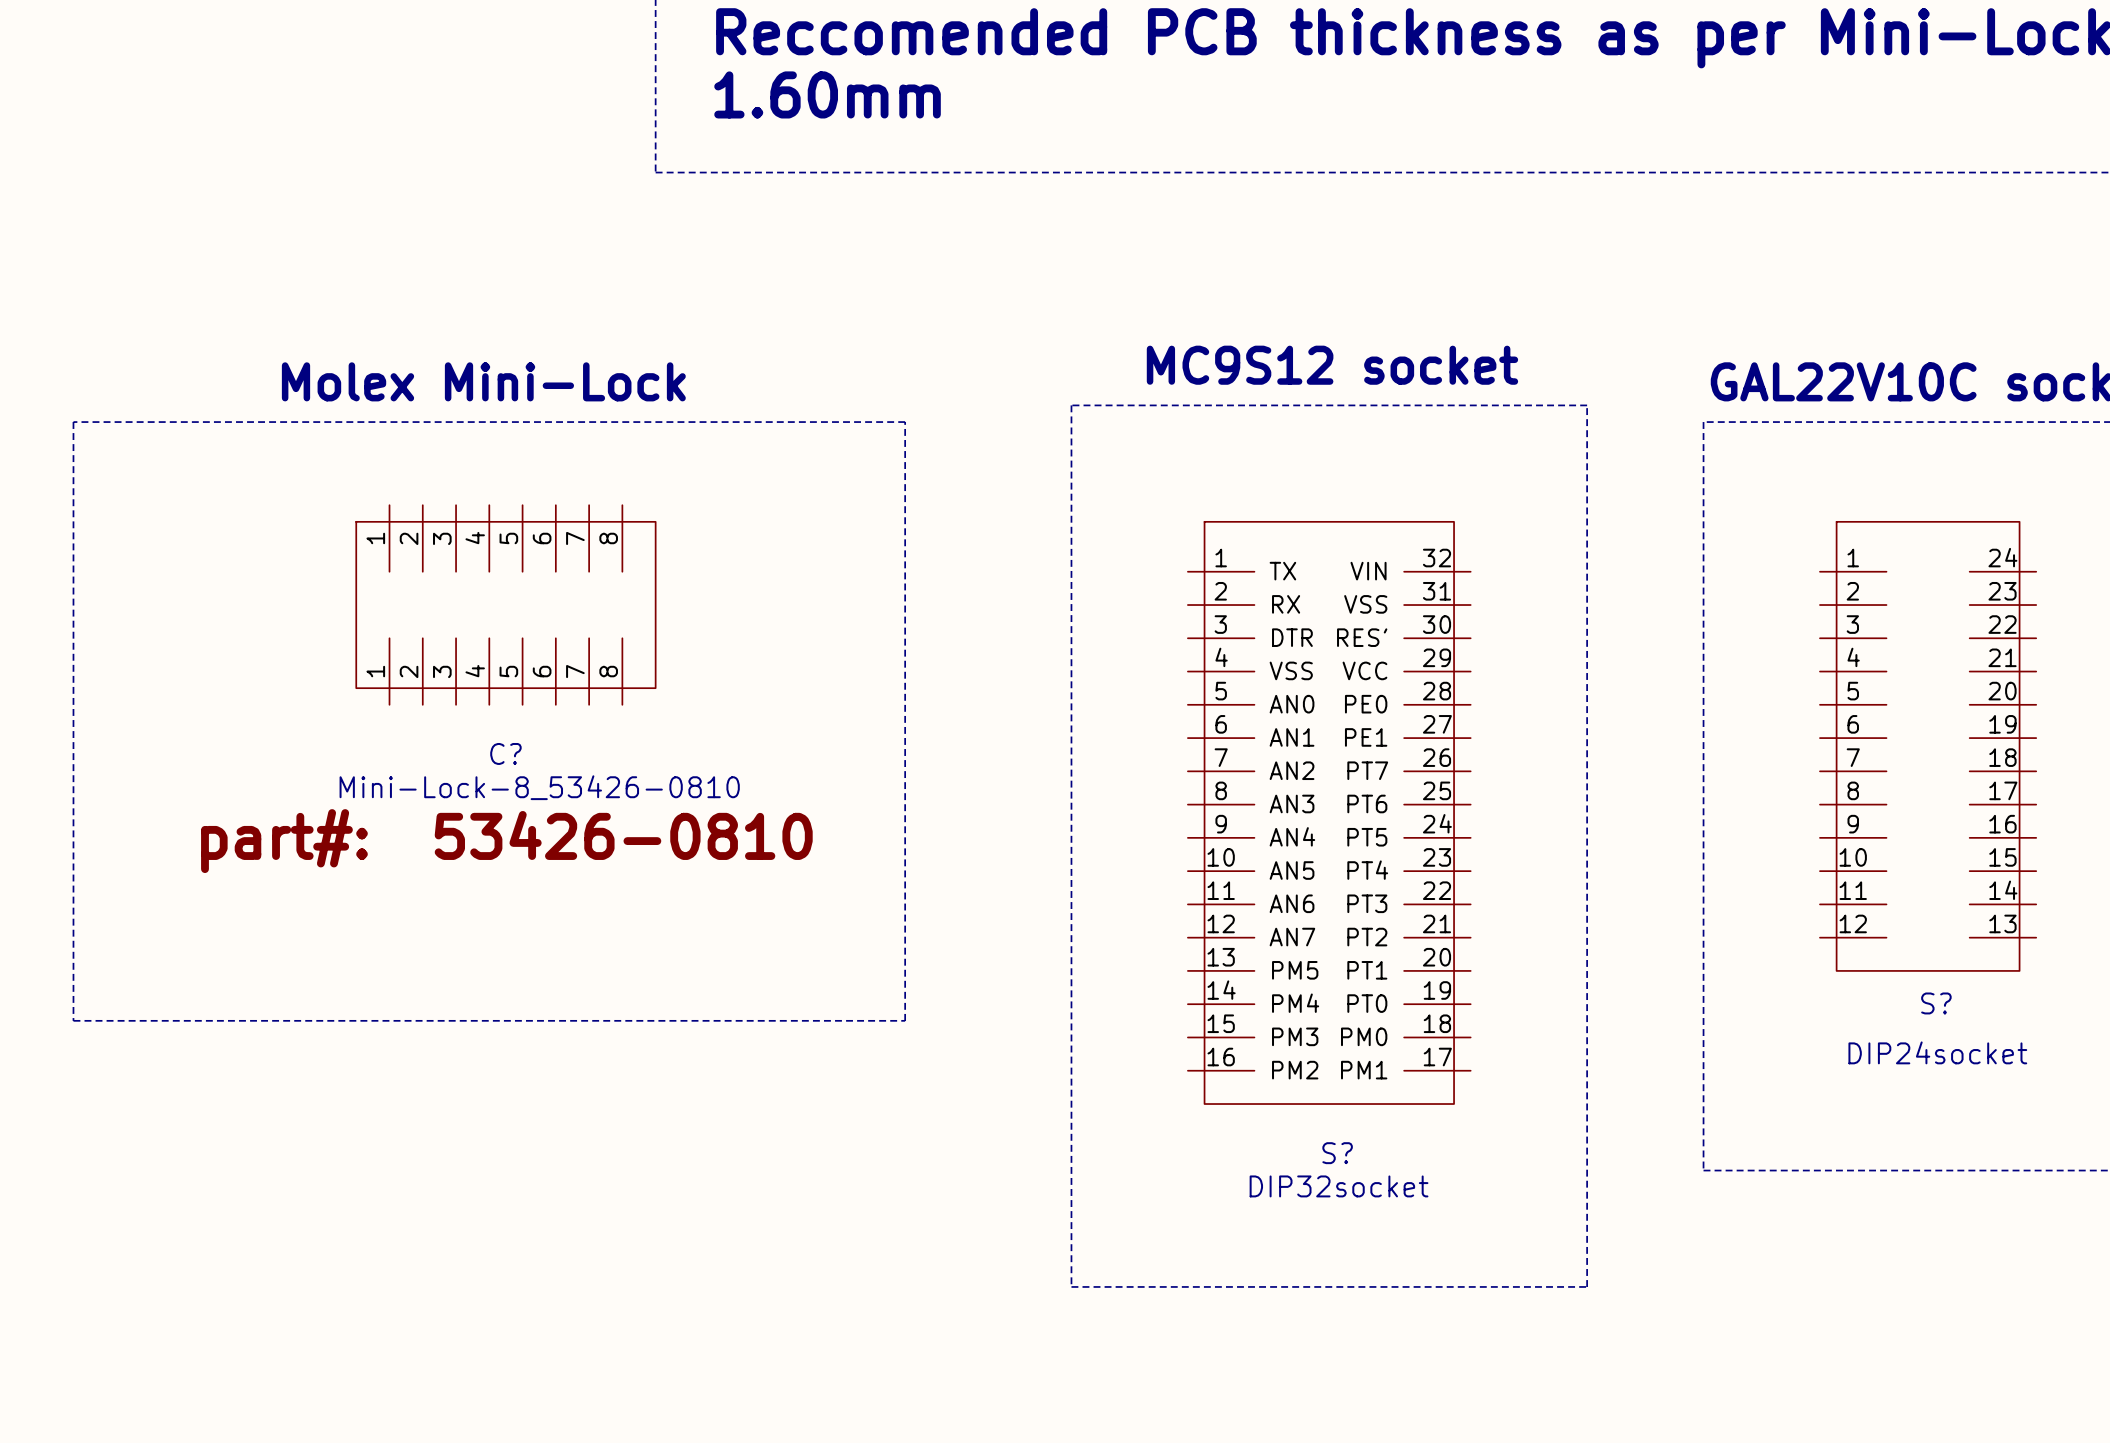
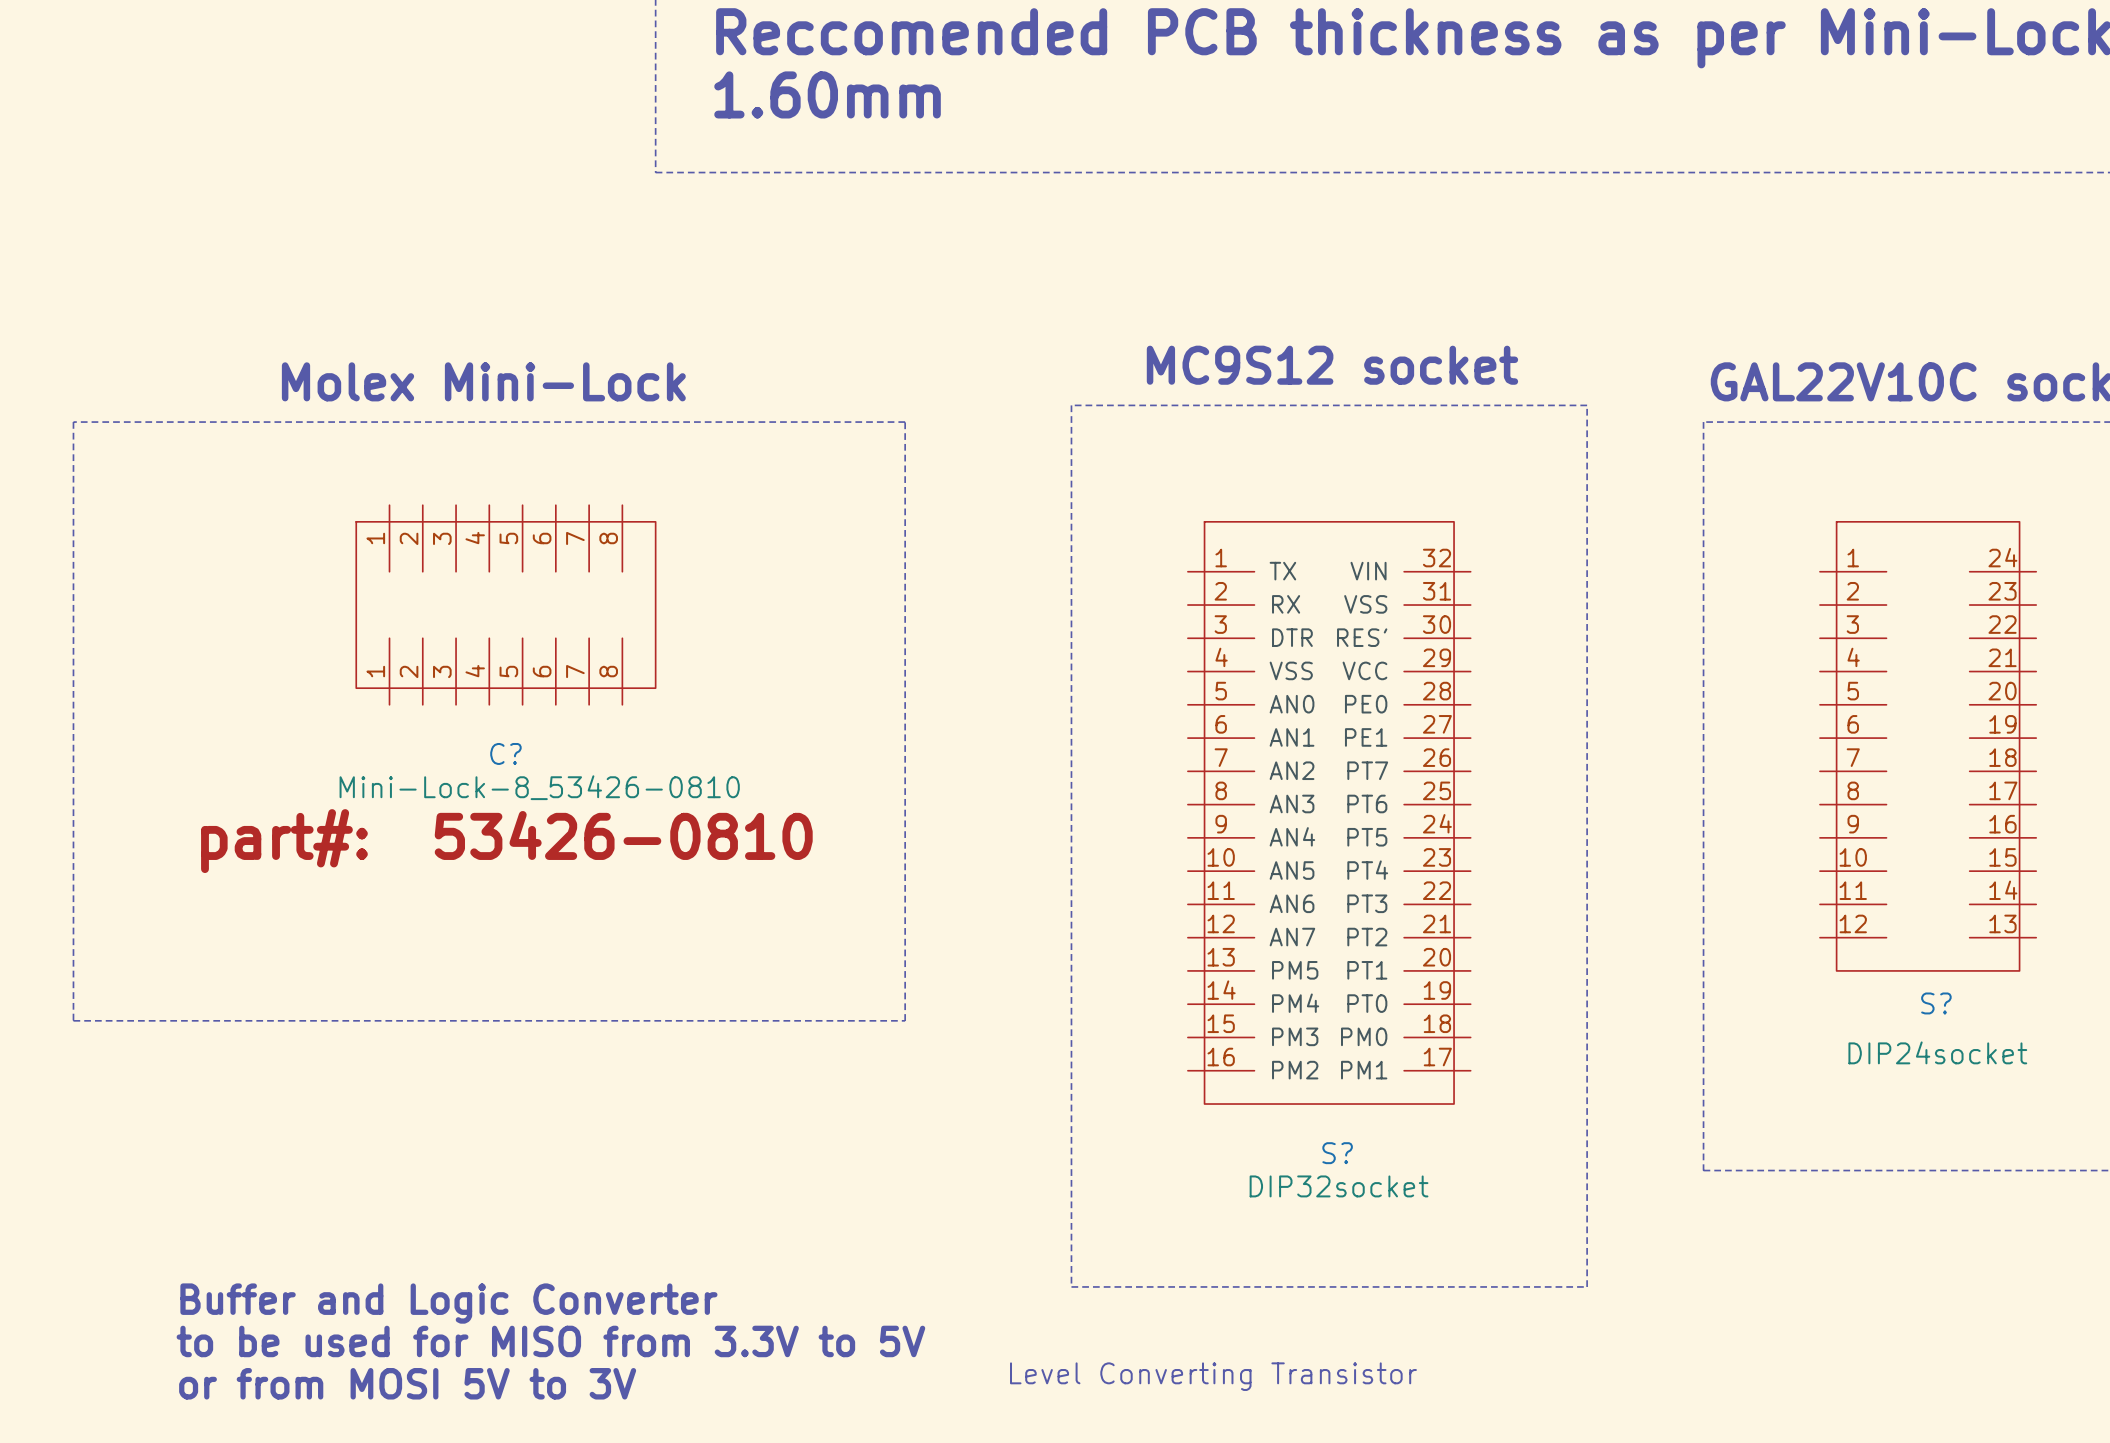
text: none -> Buffer and Logic Converter (448, 1303)
text: none -> to be used for MISO from 3.3V to 5V (550, 1341)
text: none -> Level Converting Transistor (1213, 1376)
text: none -> or from MOSI 5V to 3V (407, 1383)

